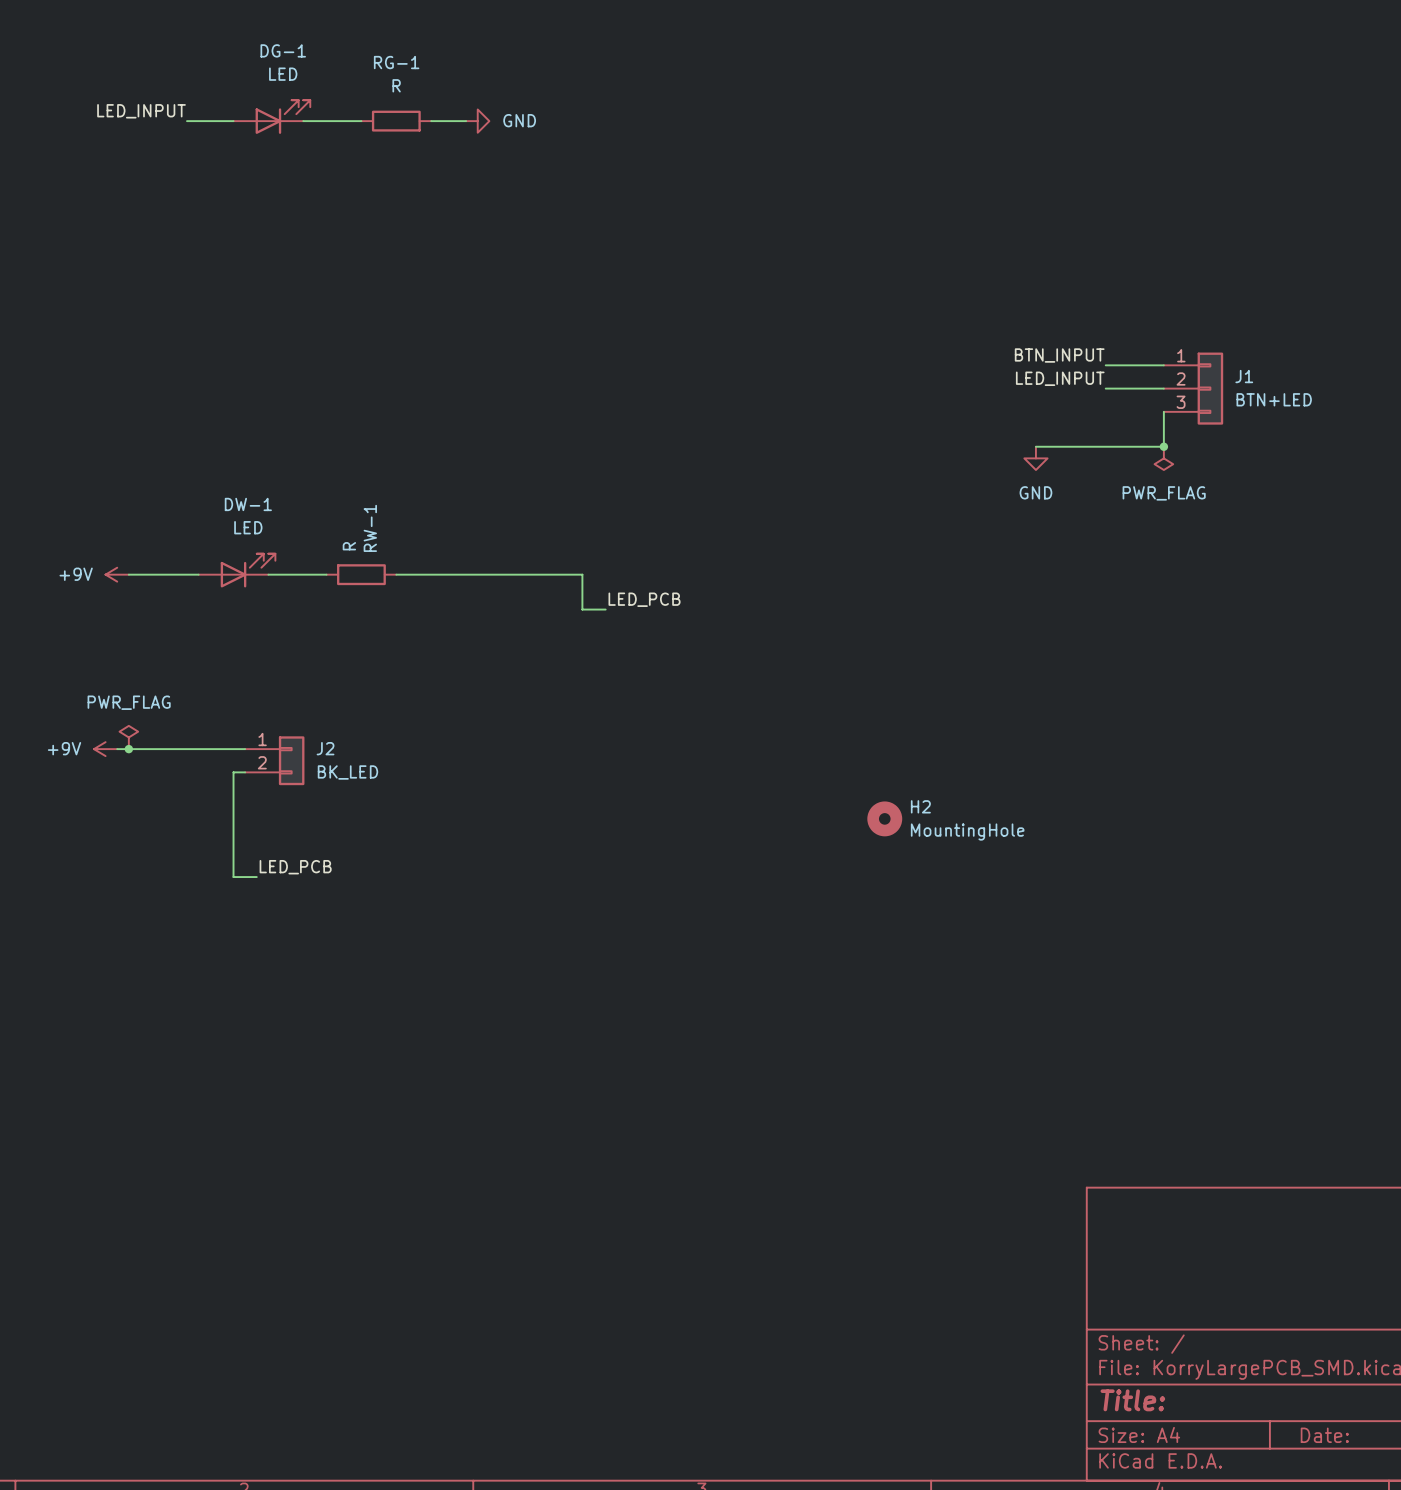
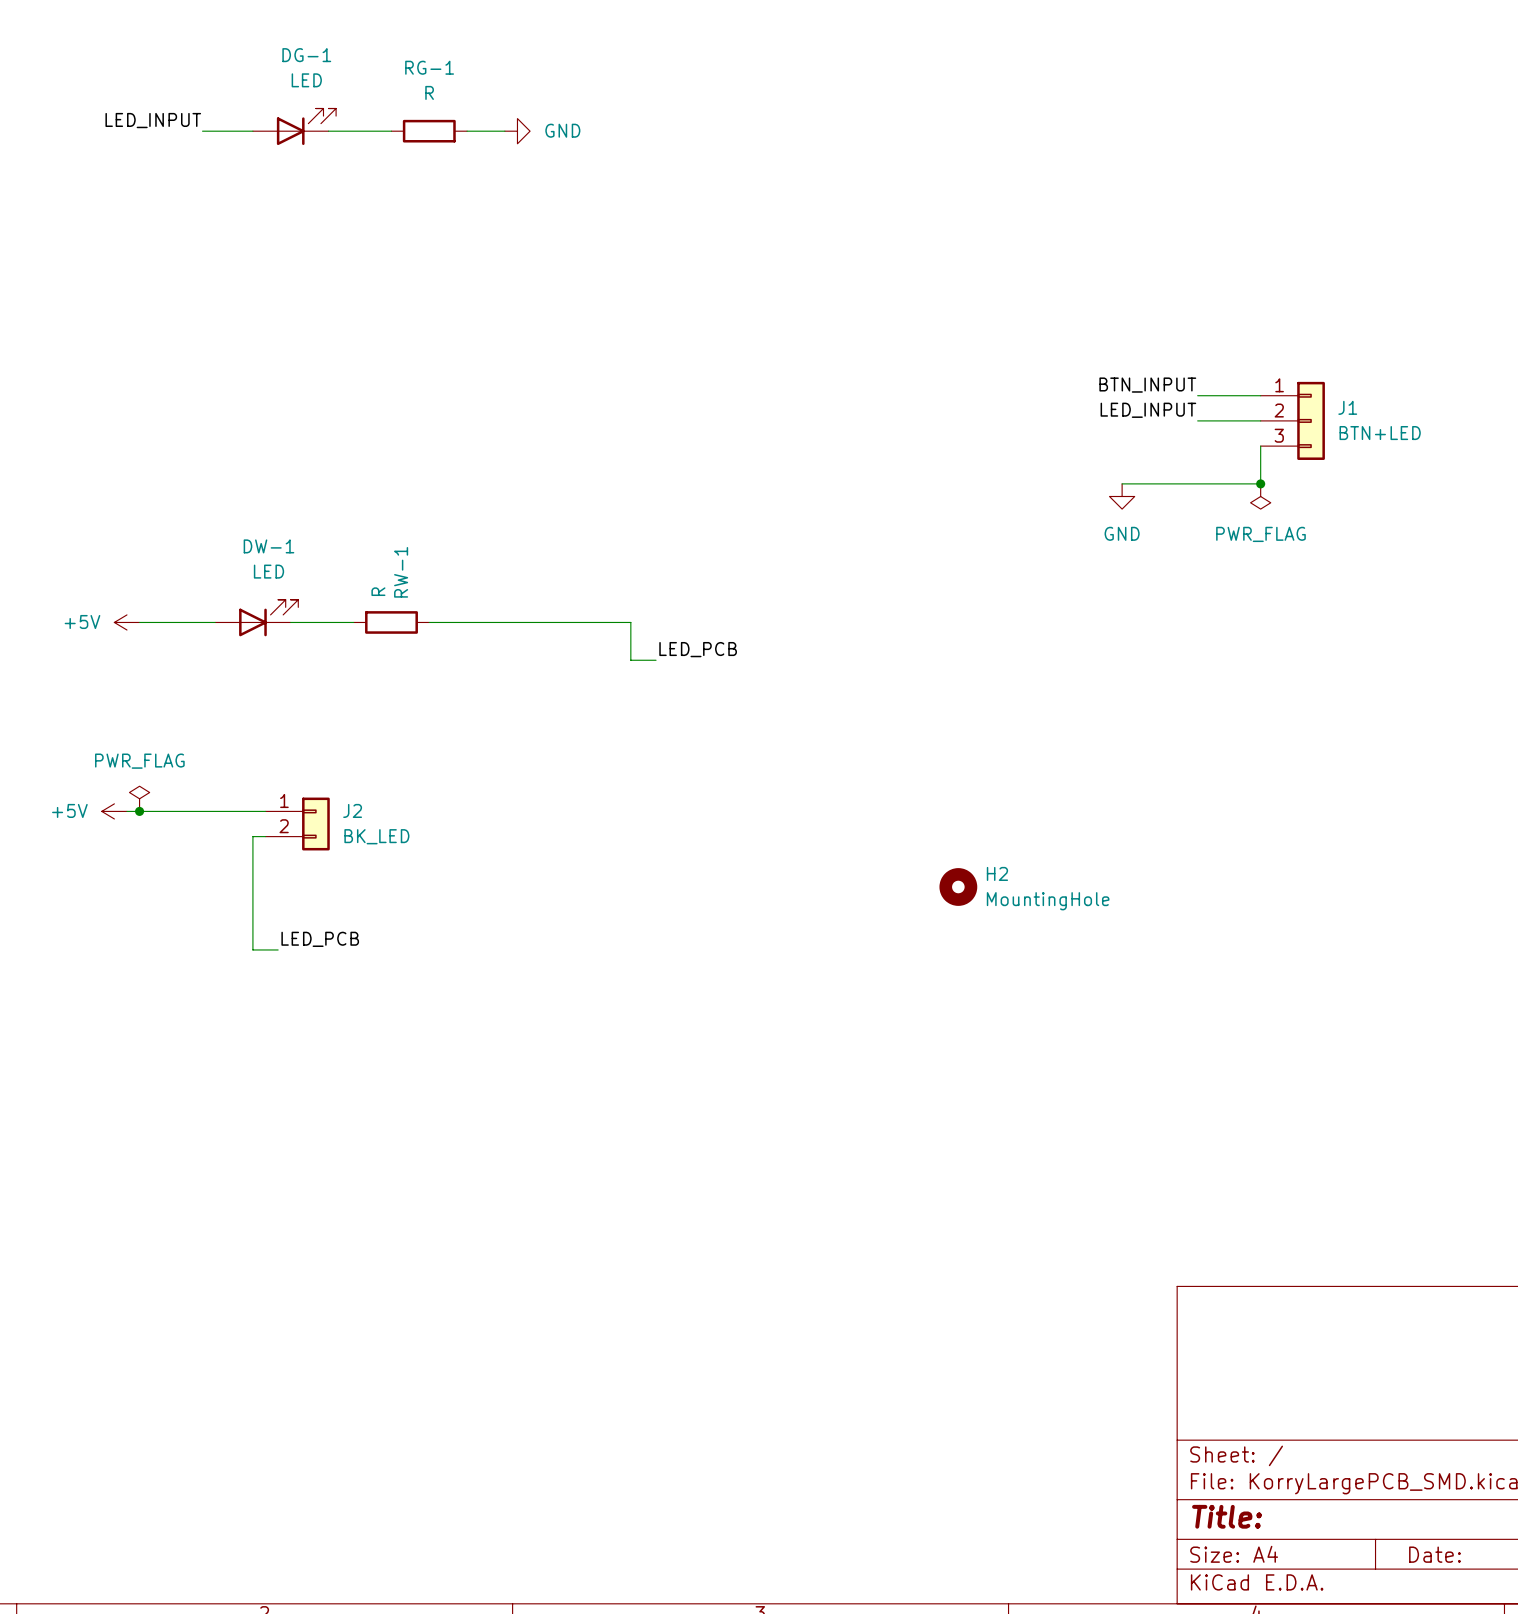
power symbol: +9V (117, 574) -> +5V (126, 622)
power symbol: +9V (105, 749) -> +5V (114, 811)

